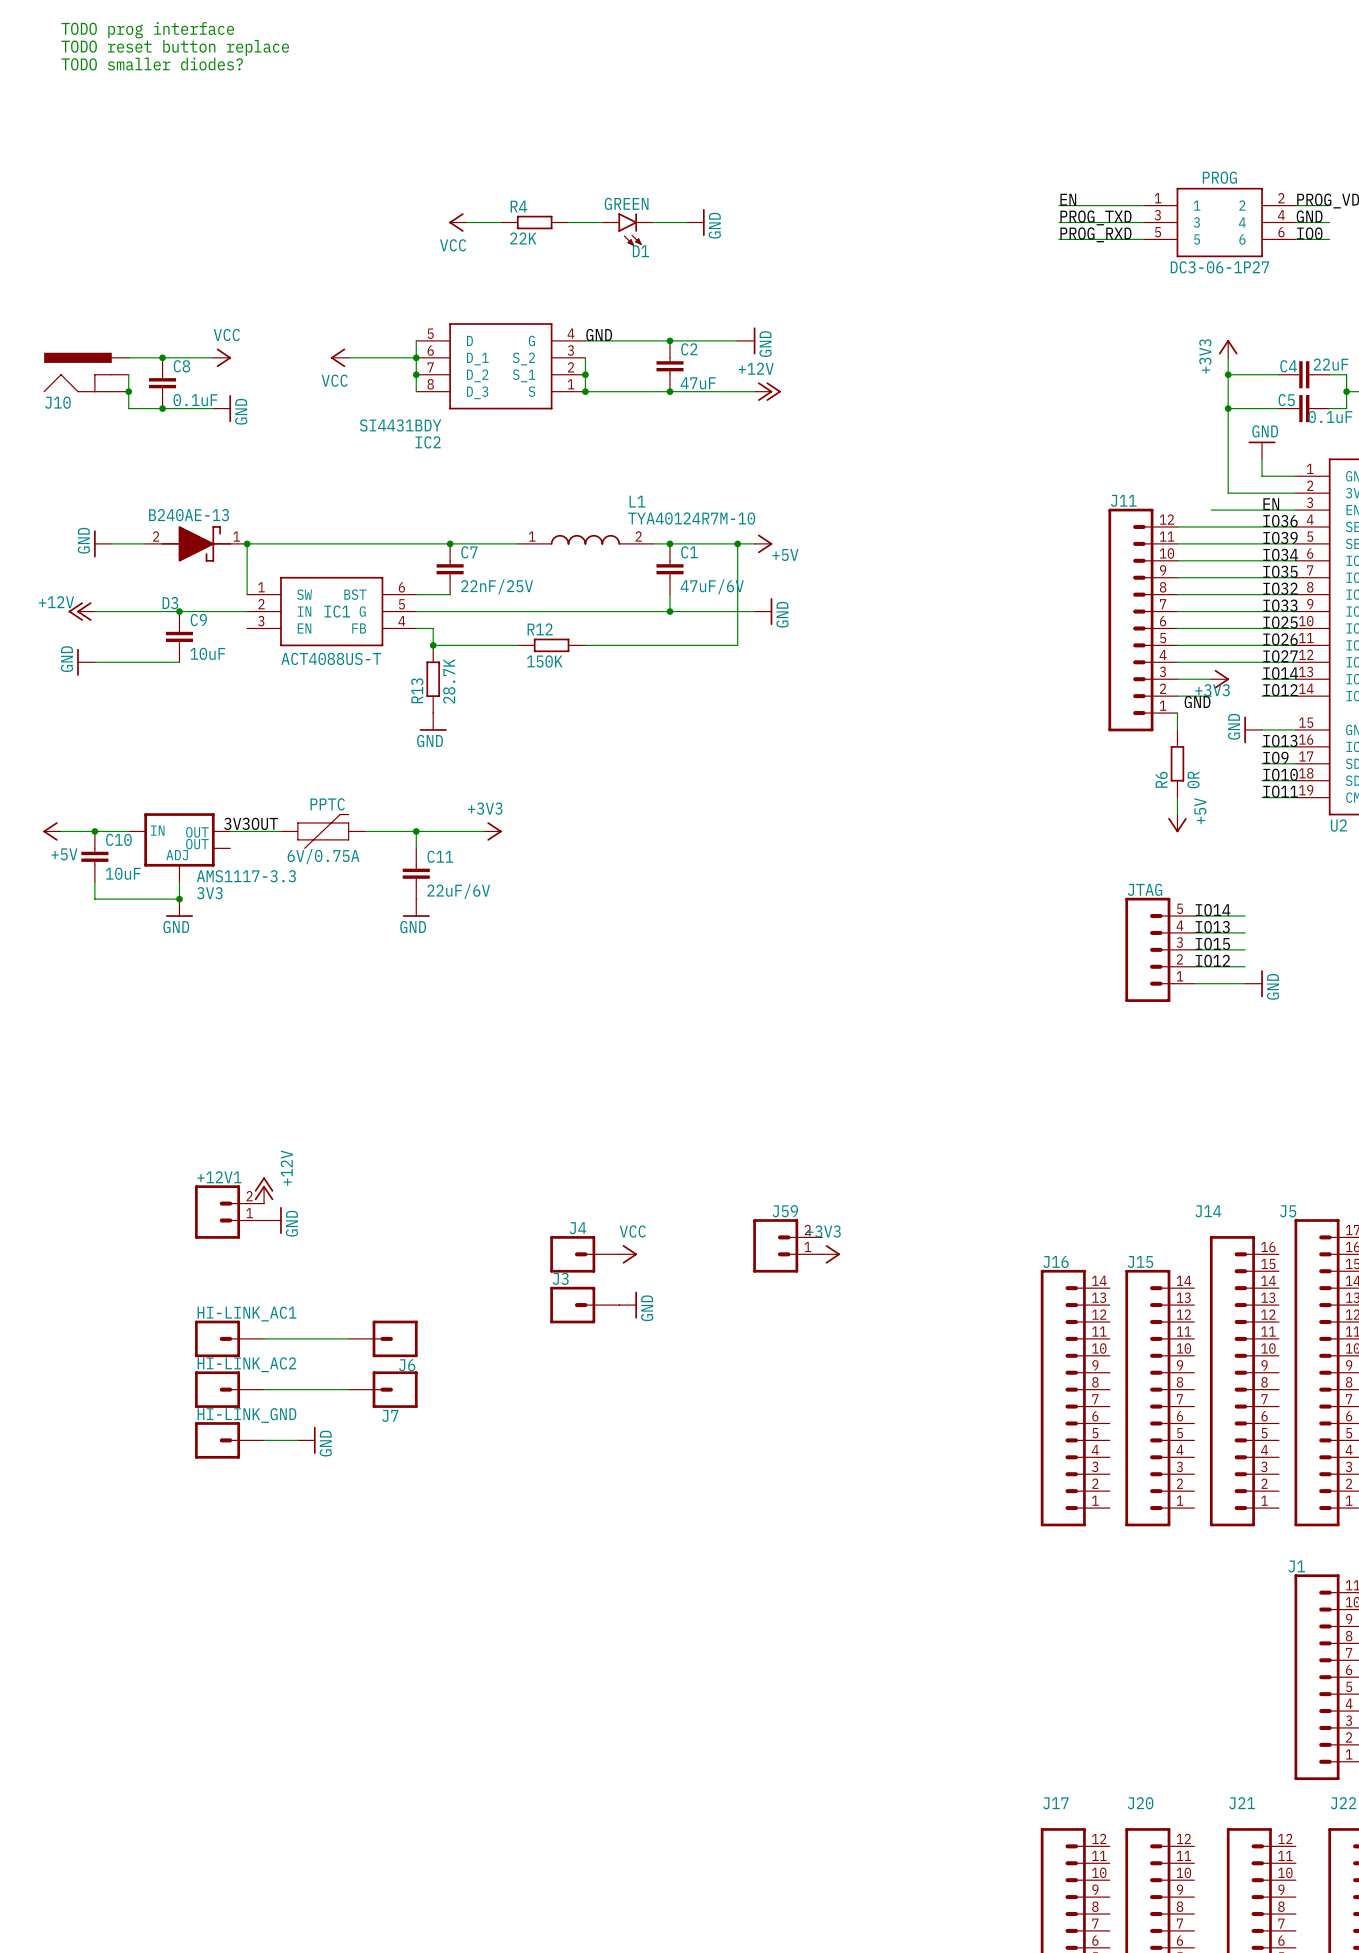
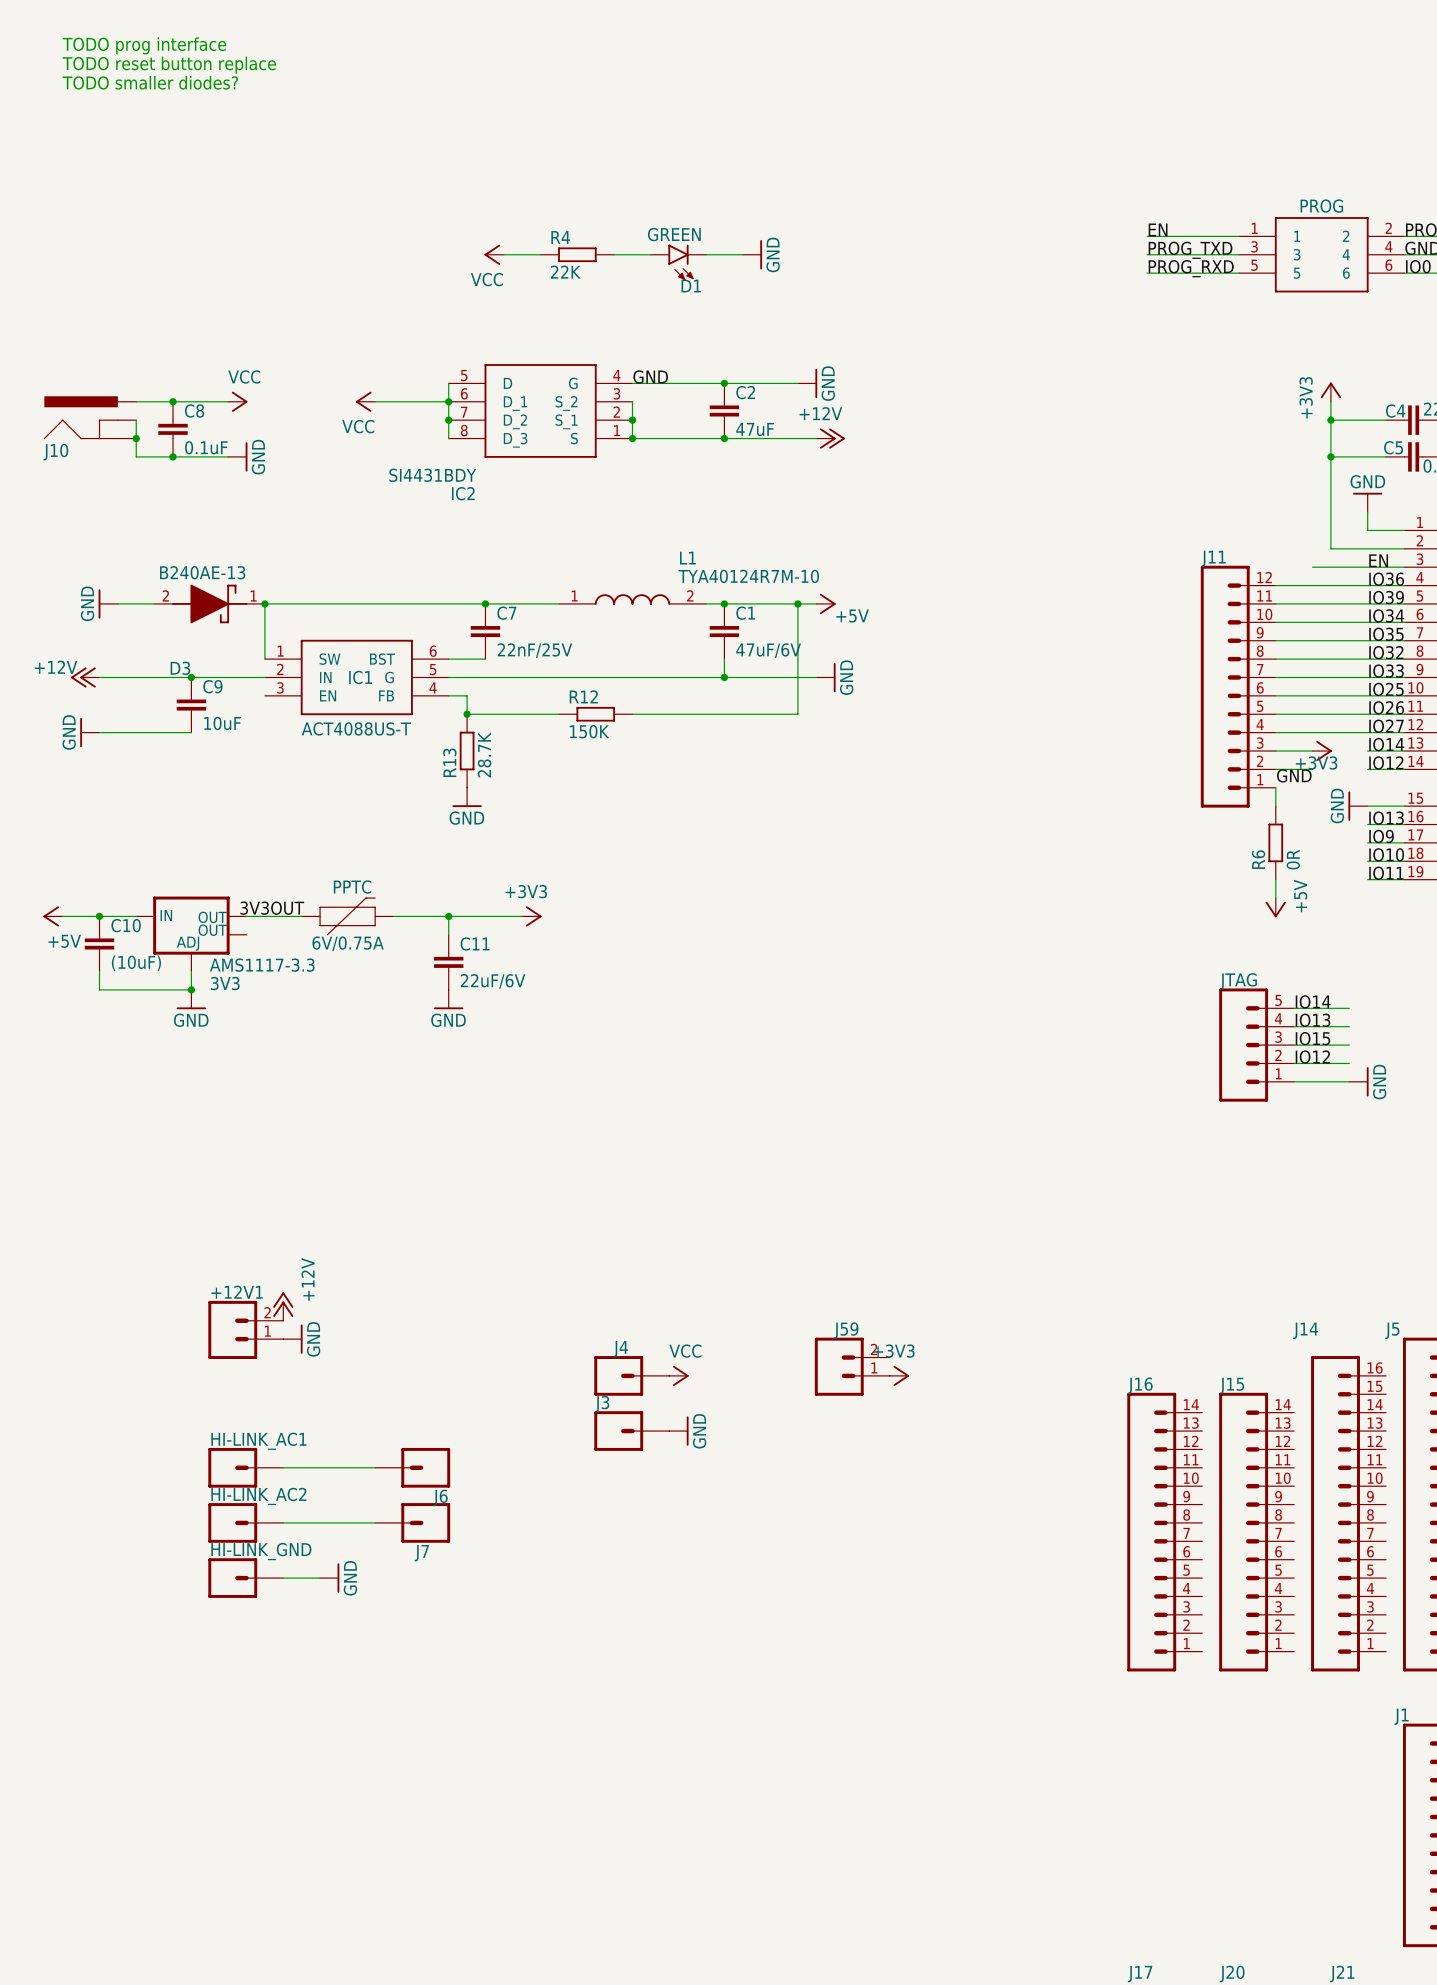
PROG value: DC3-06-1P27 (1219, 267) -> none
C10 value: 10uF (123, 873) -> (10uF) (136, 963)

